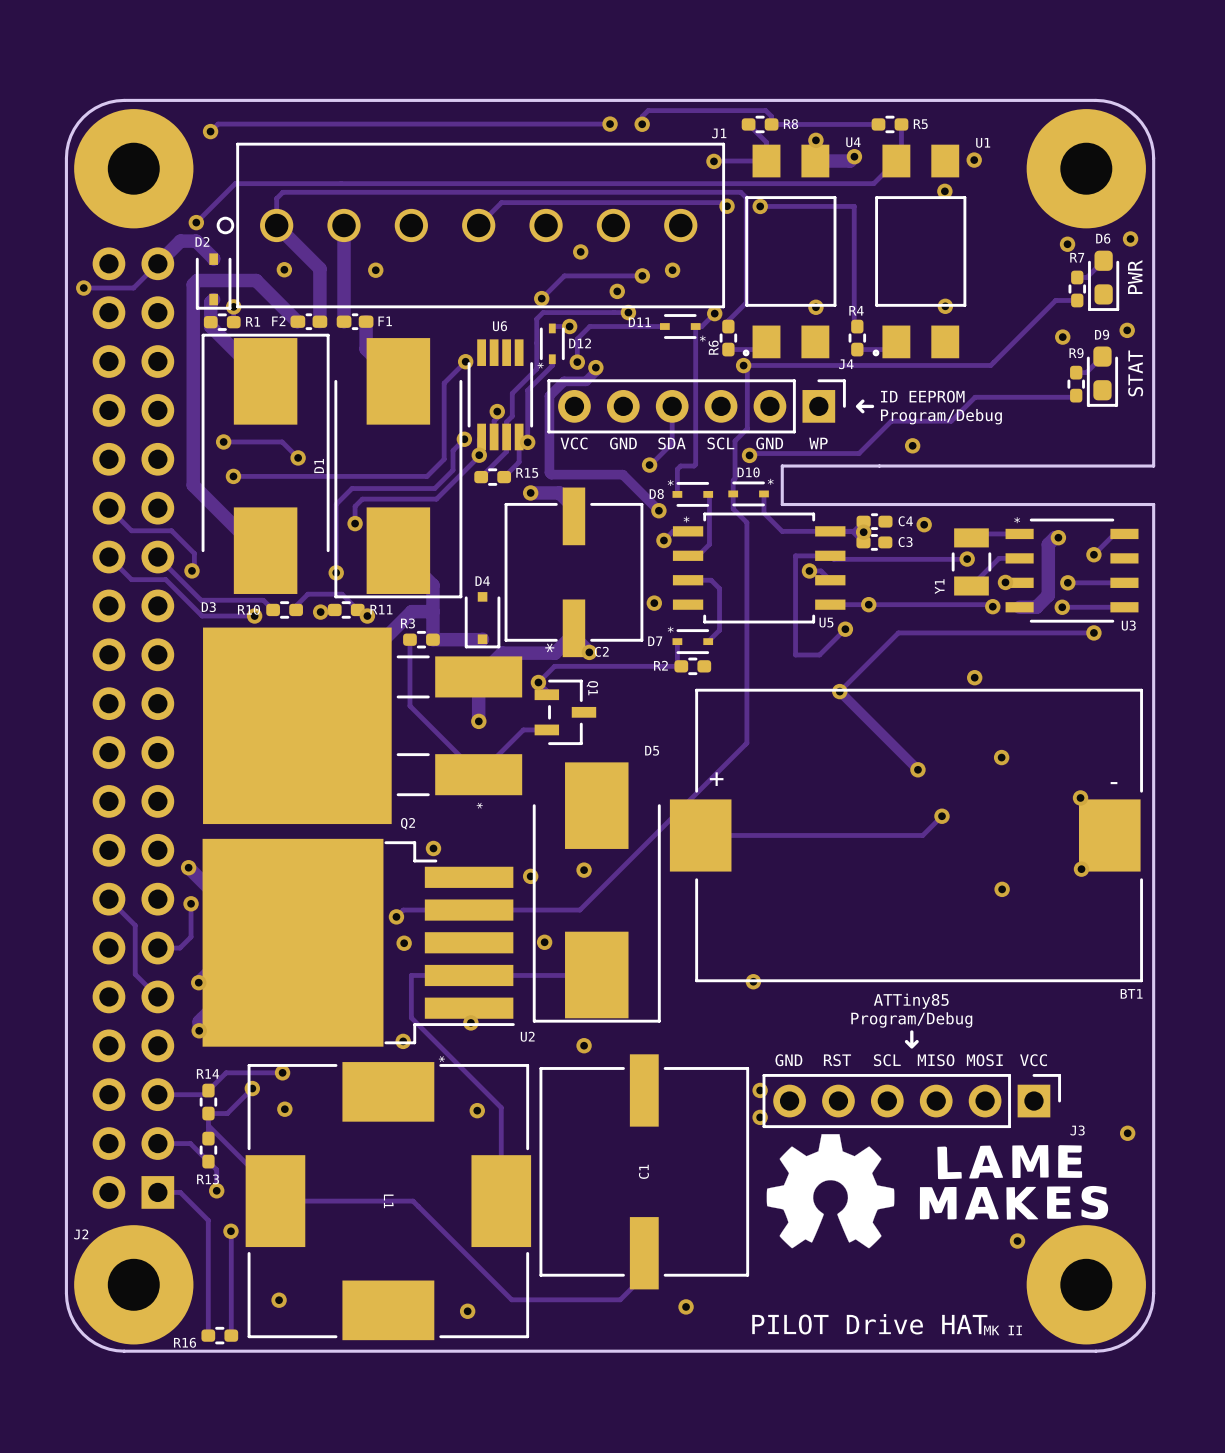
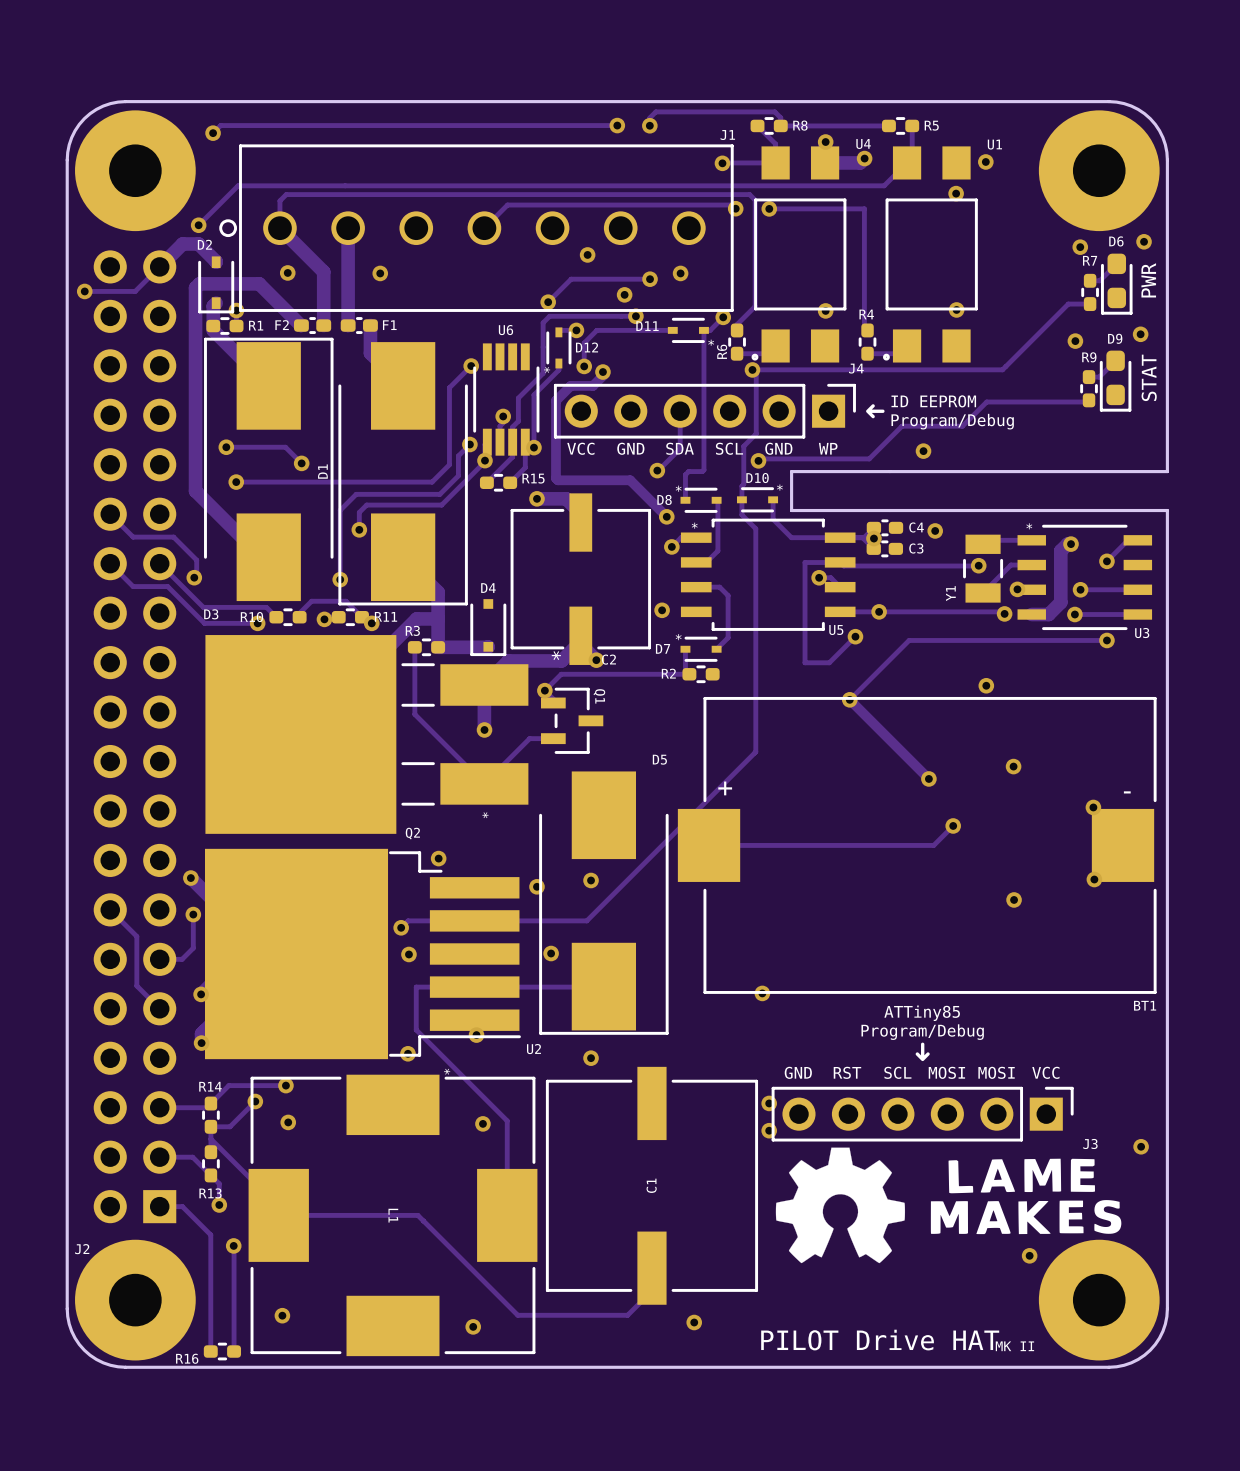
text: MISO (936, 1060) -> MOSI (946, 1072)

